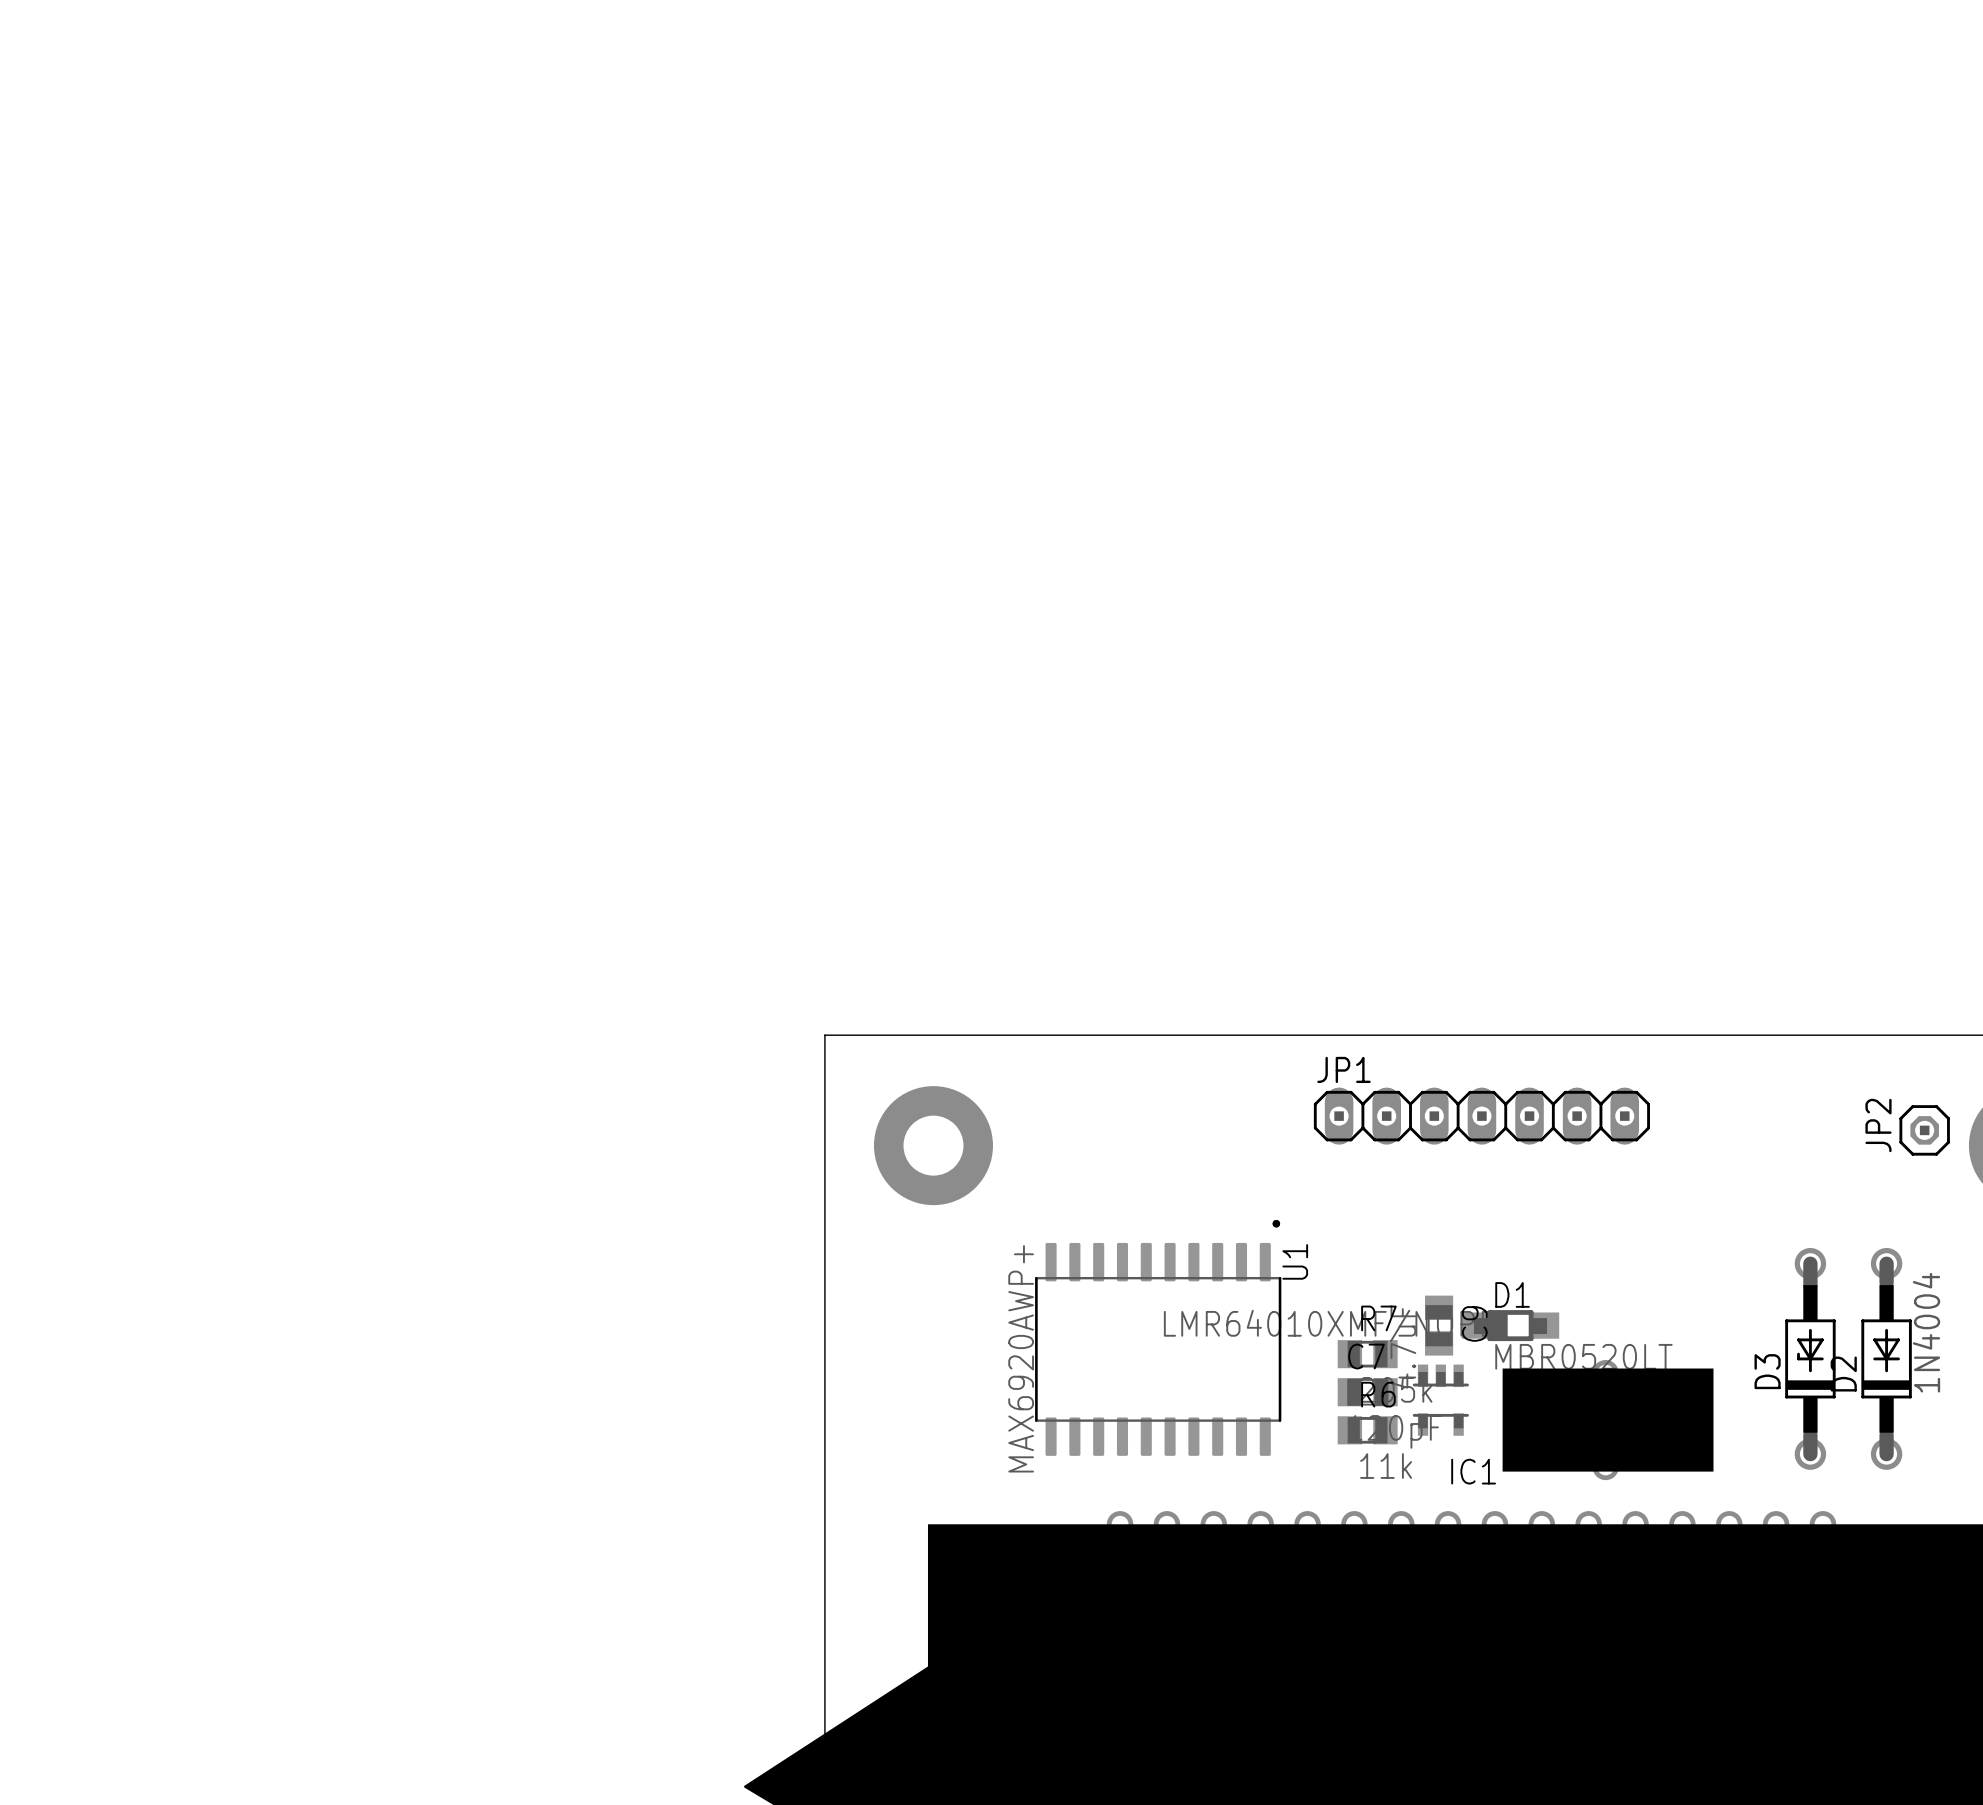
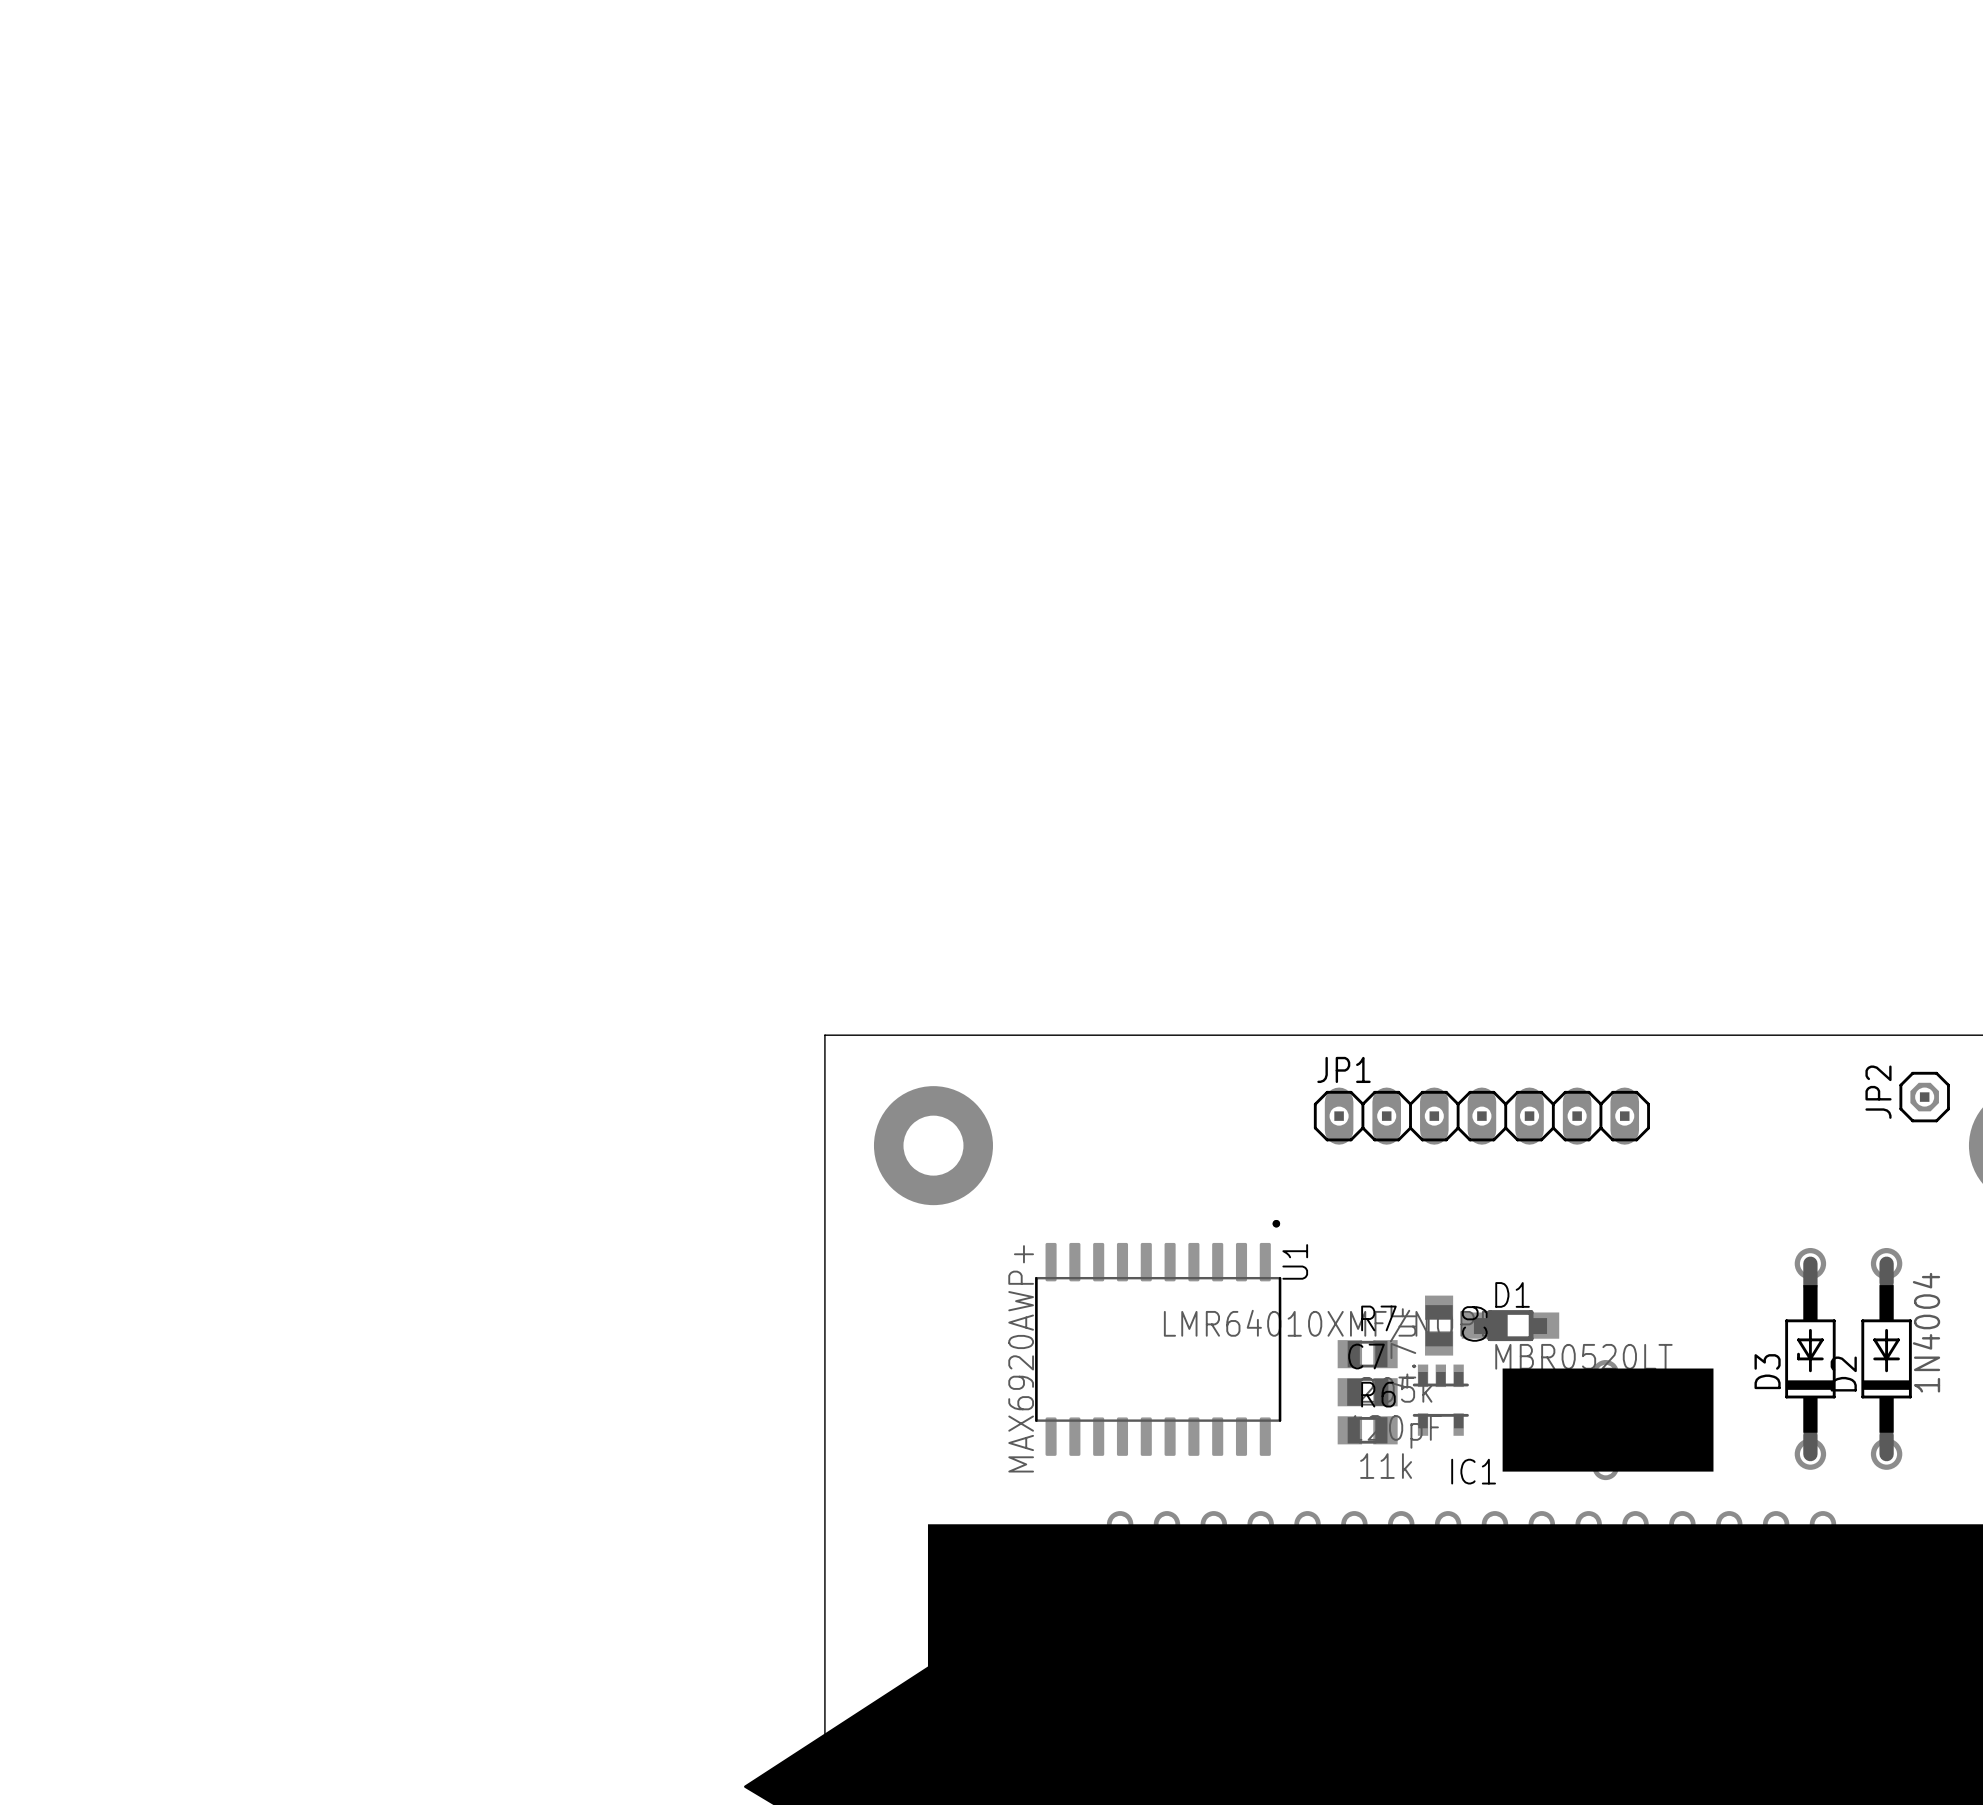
JP2 position: (1924, 1130) -> (1924, 1097)

